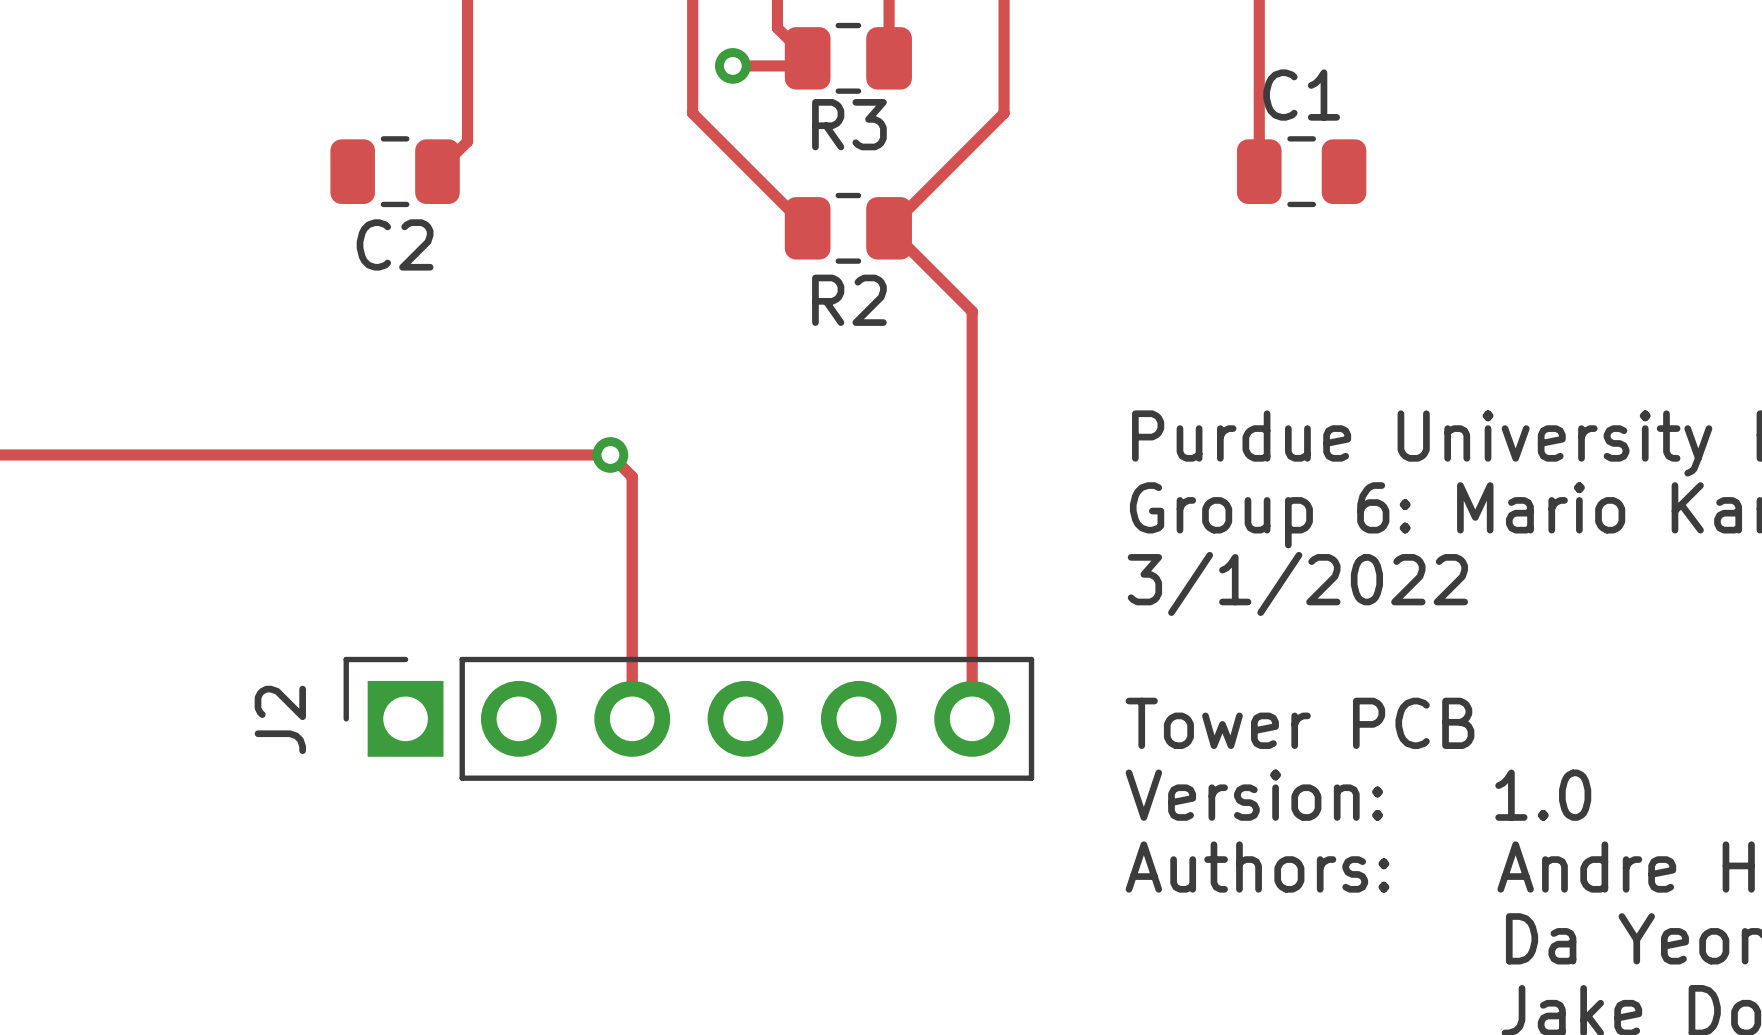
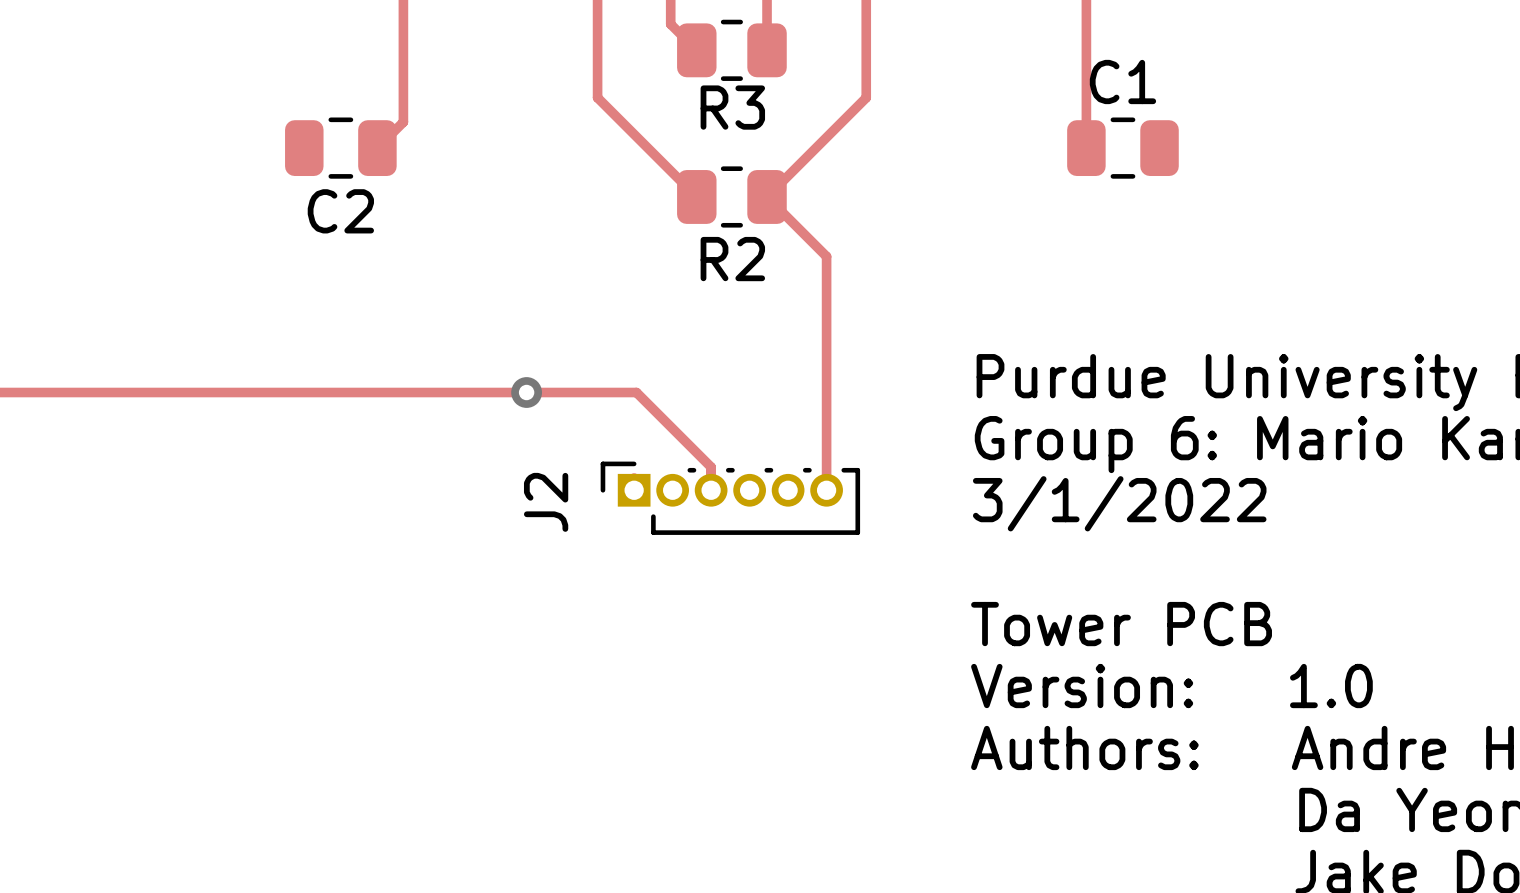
track: (807, 58) (800, 65) (732, 65) -> none
via: (732, 65) -> none
track: (958, 297) (972, 311) (972, 718) -> (826, 256) (826, 490)
track: (610, 454) (632, 476) (632, 718) -> (526, 392) (636, 392) (711, 467) (711, 490)
J2 footprint: [343, 656, 1035, 781] -> [600, 461, 861, 535]
J2 name position: J2 (280, 719) -> J2 (546, 502)

